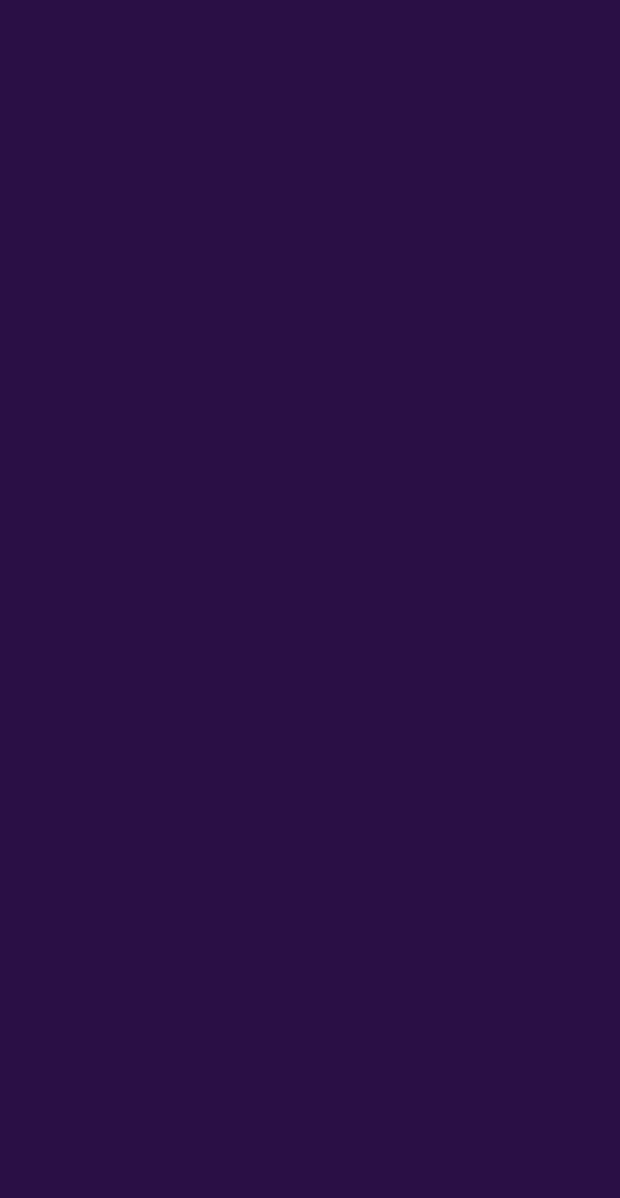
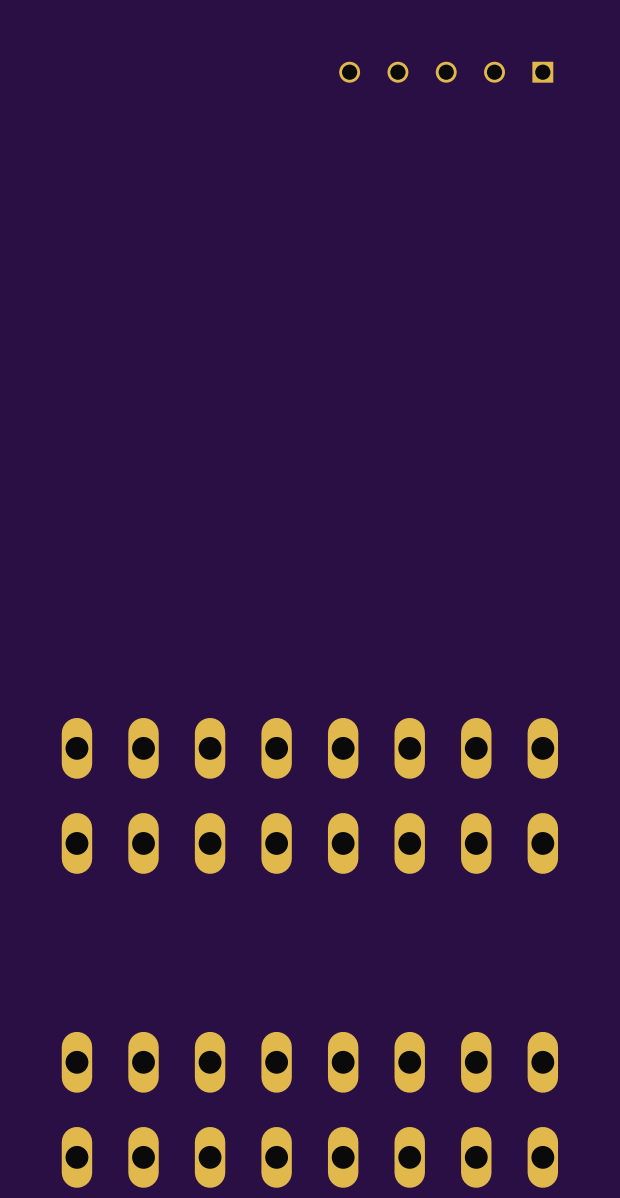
part: none -> (446, 72)
part: none -> (309, 795)
part: none -> (309, 1109)

